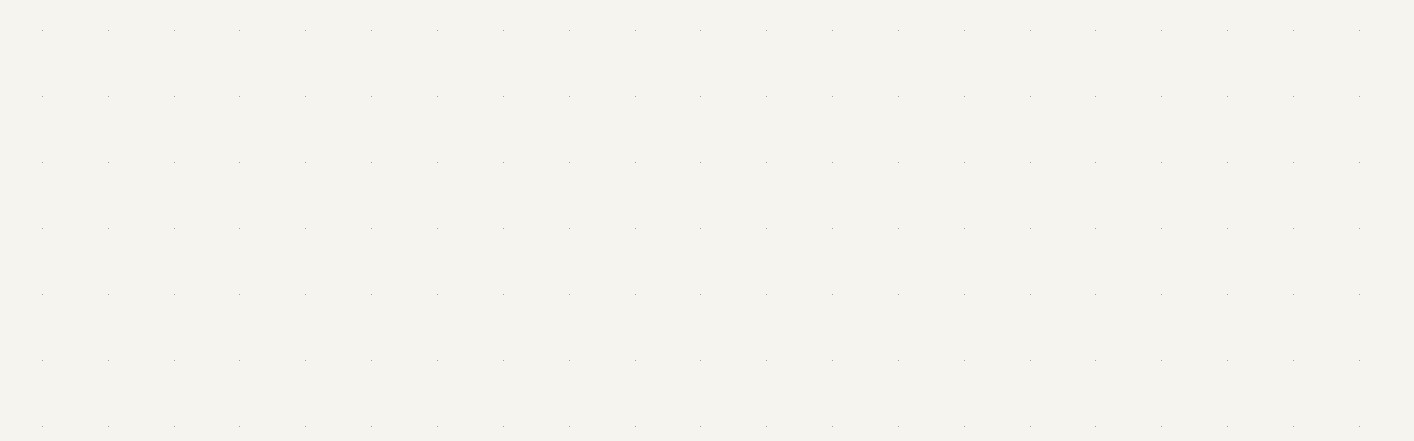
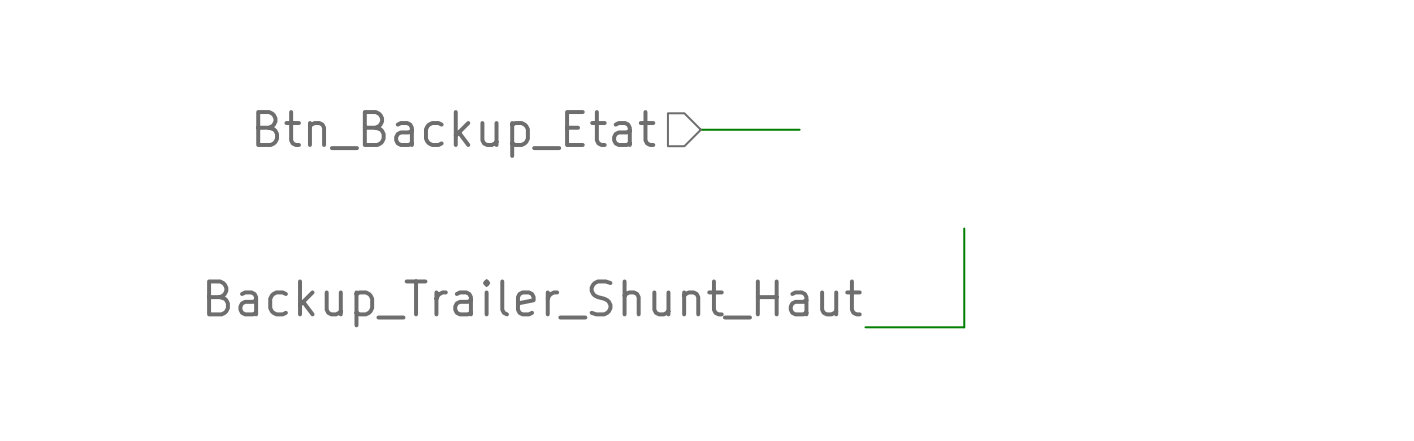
wire: none -> (700, 129) (799, 129)
hierarchical label: none -> Btn_Backup_Etat (455, 134)
wire: none -> (964, 228) (964, 327) (865, 327)
label: none -> Backup_Trailer_Shunt_Haut (534, 303)

